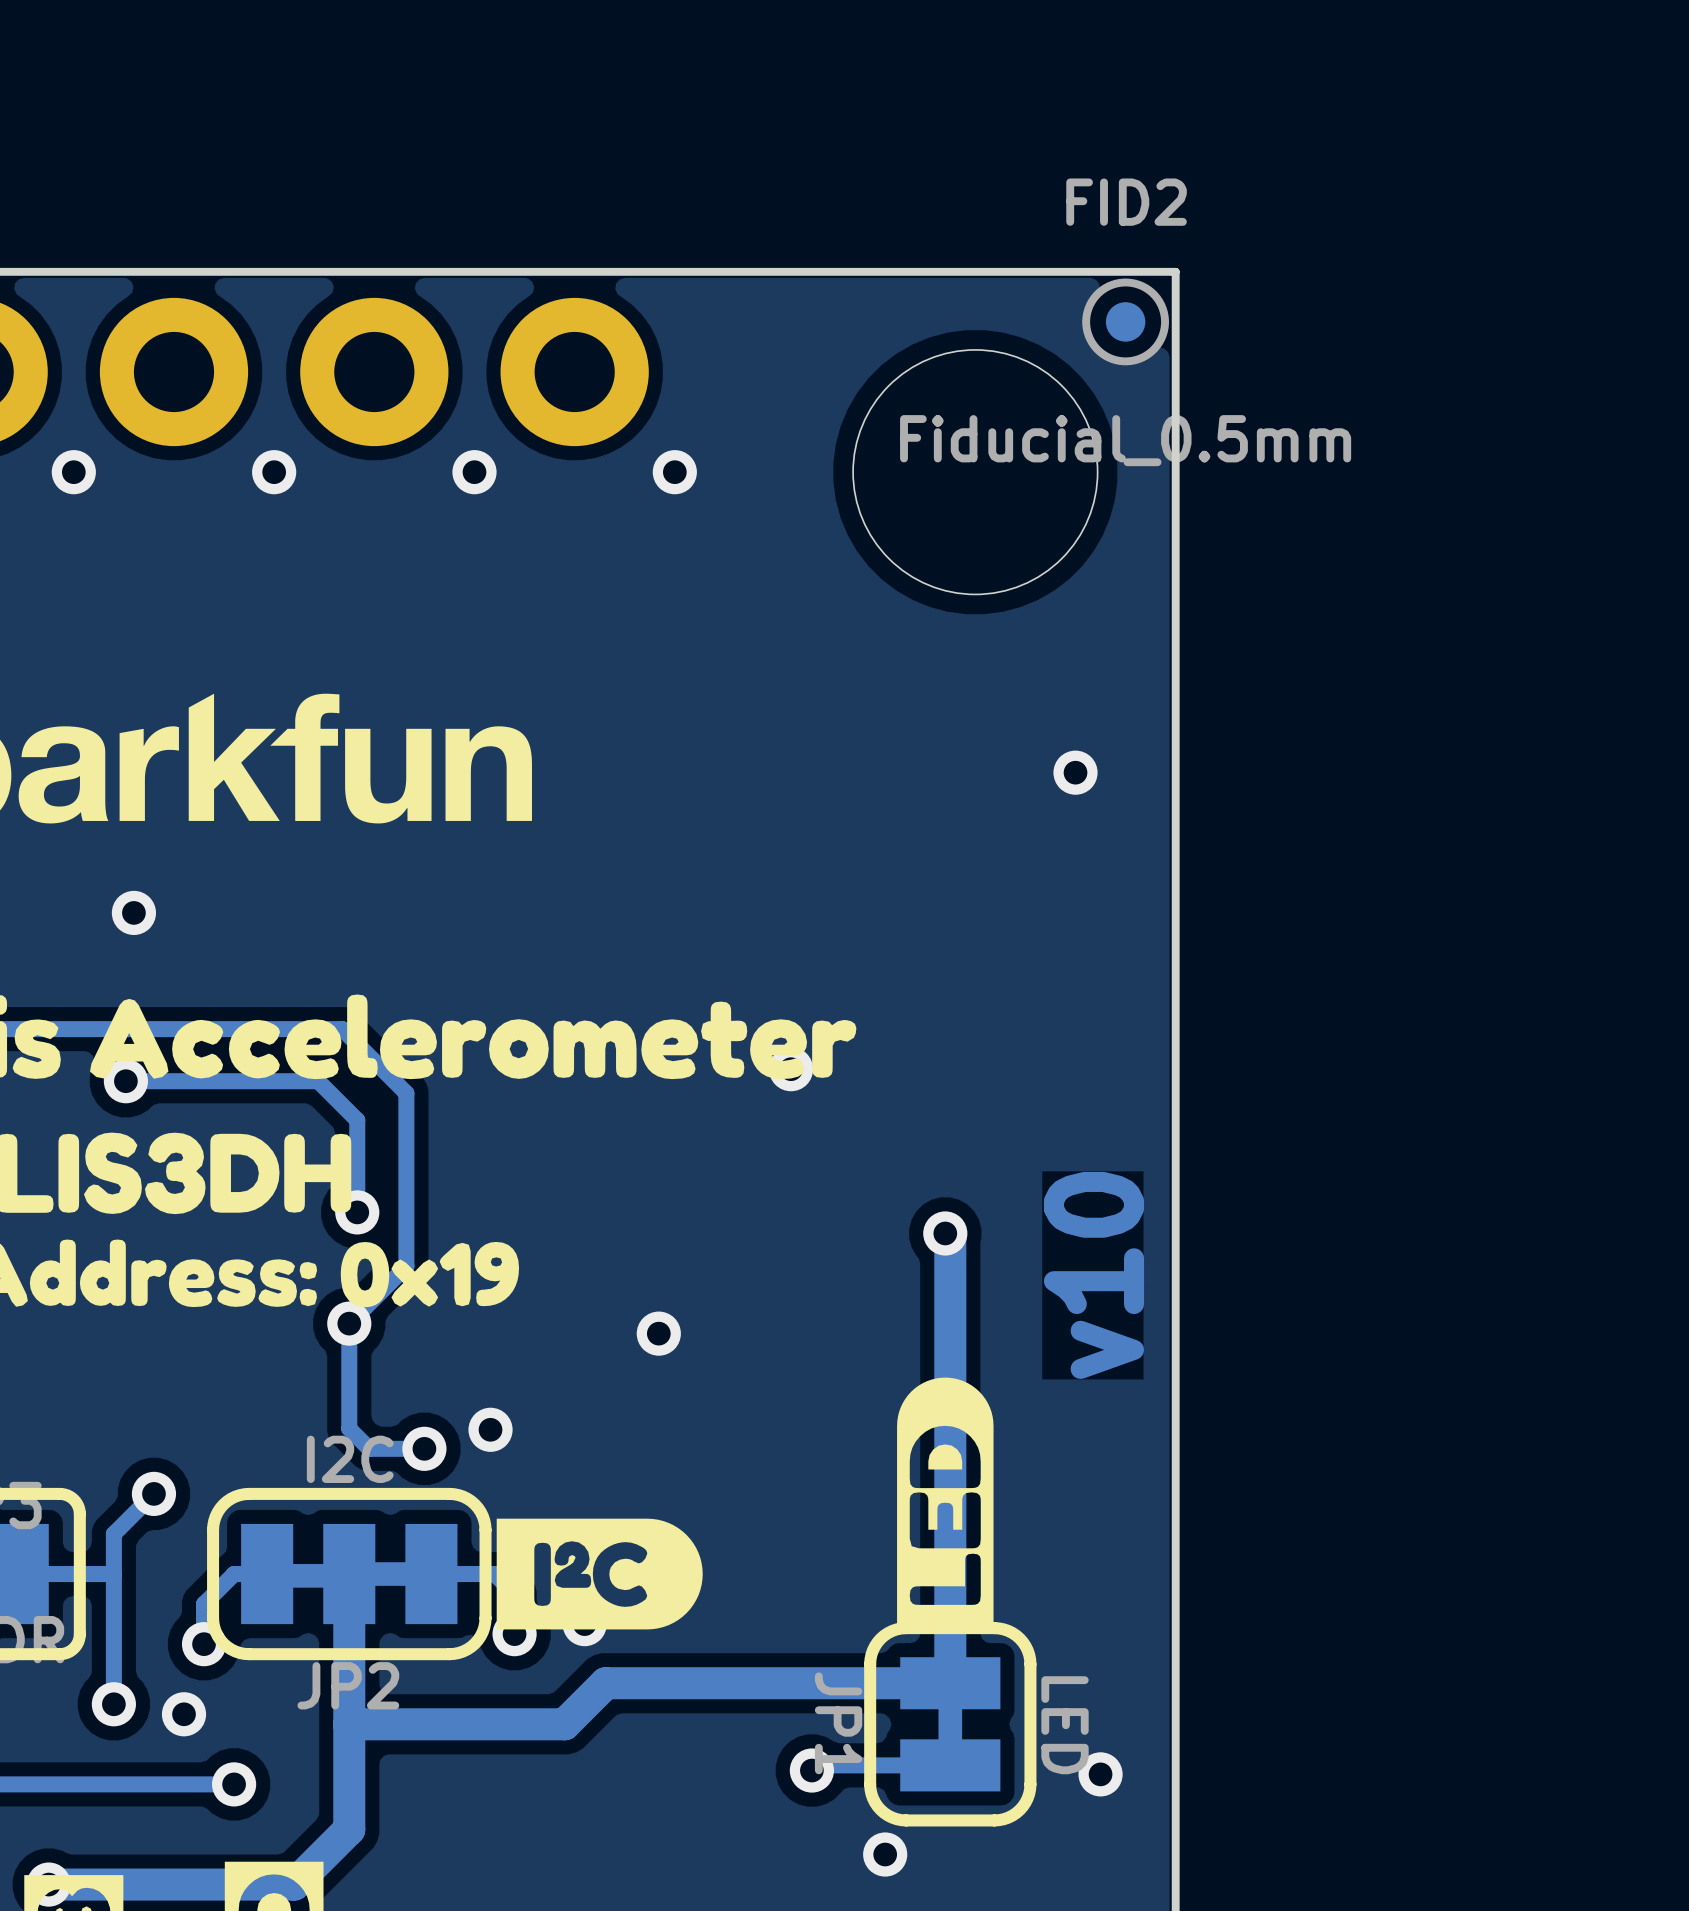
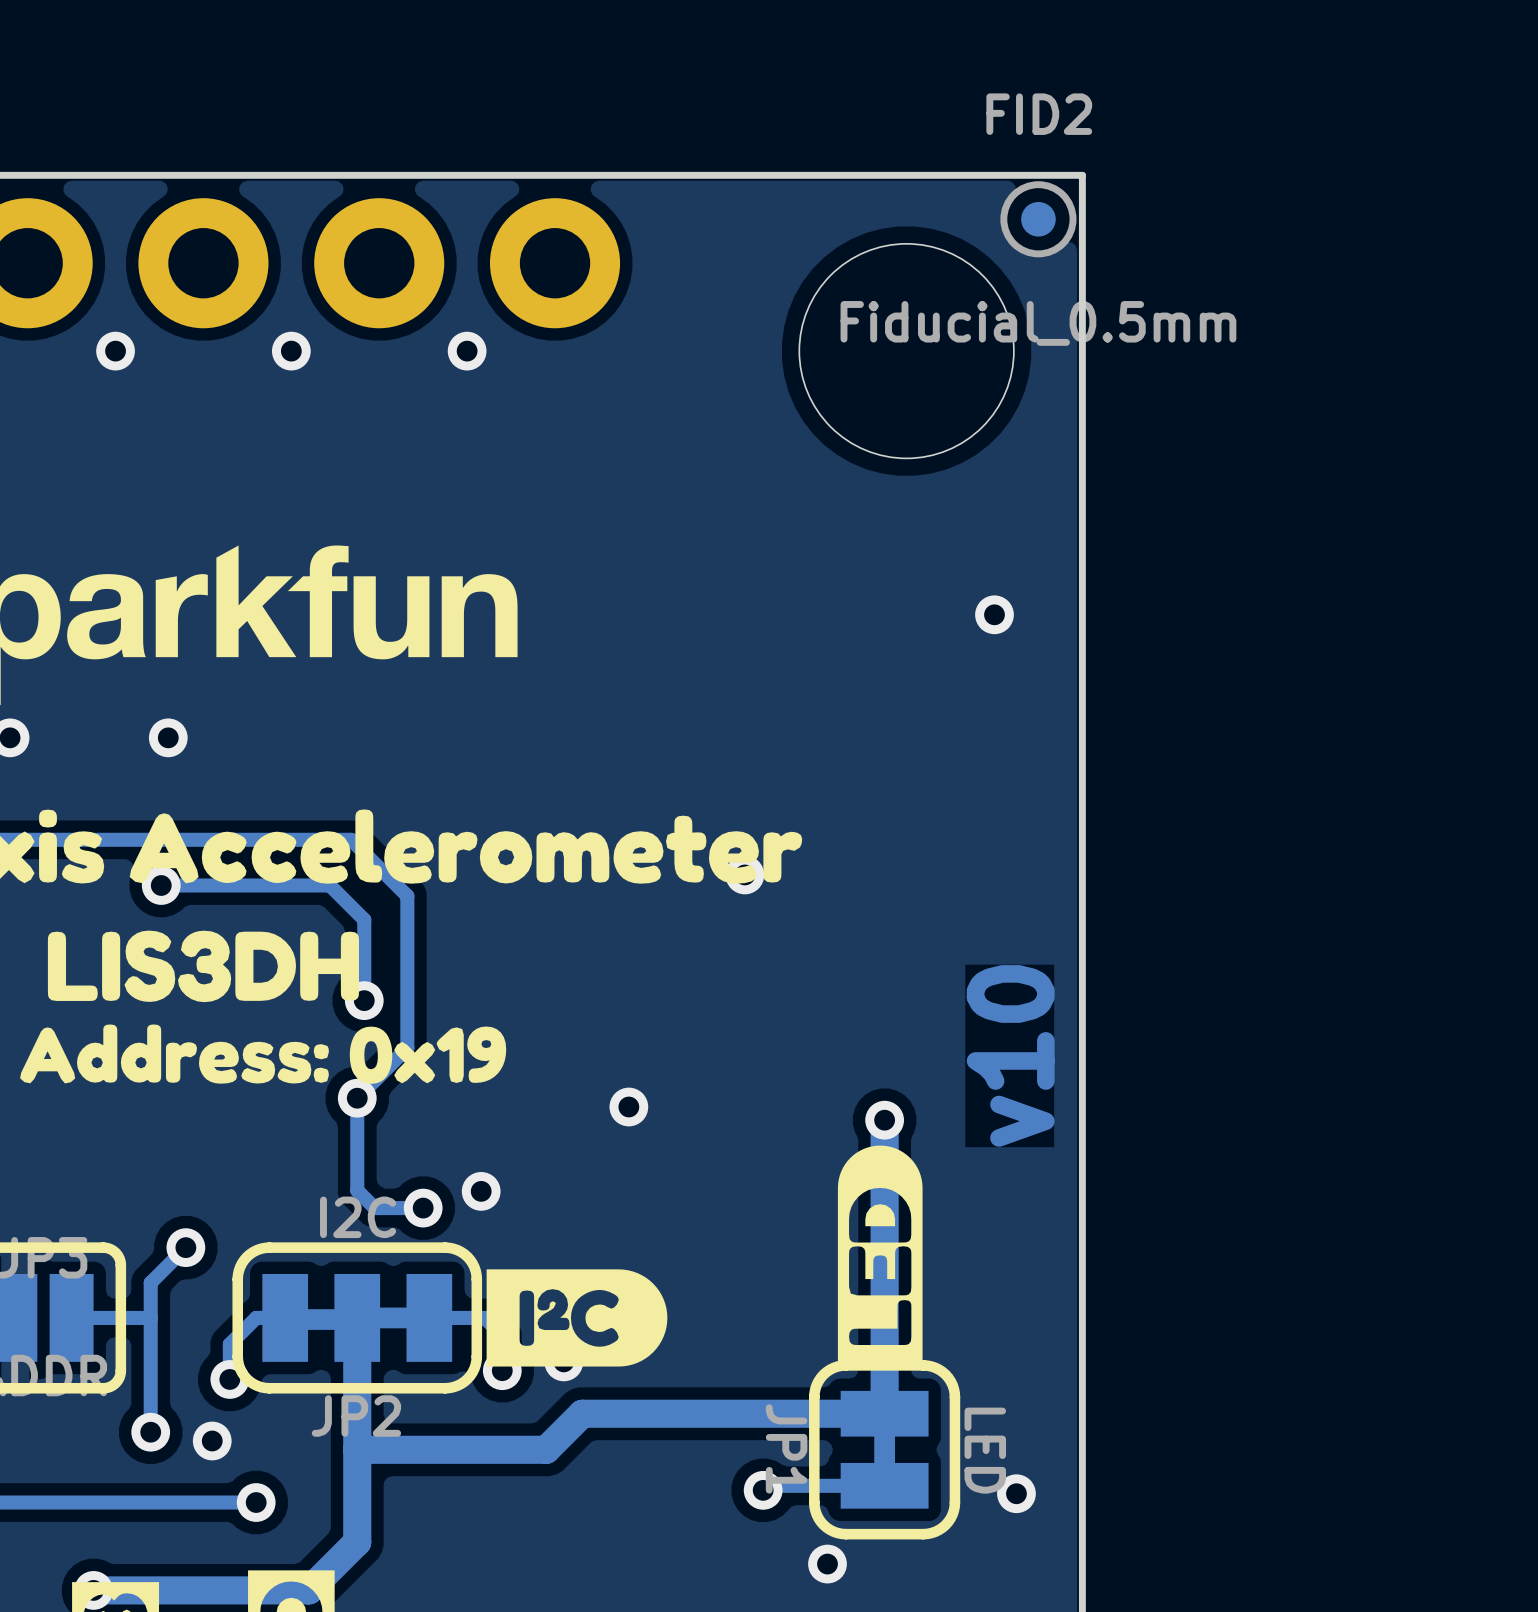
via: (674, 472) -> none
track: (945, 1233) (950, 1238) (950, 1348) -> none
via position: (945, 1233) -> (884, 1120)

